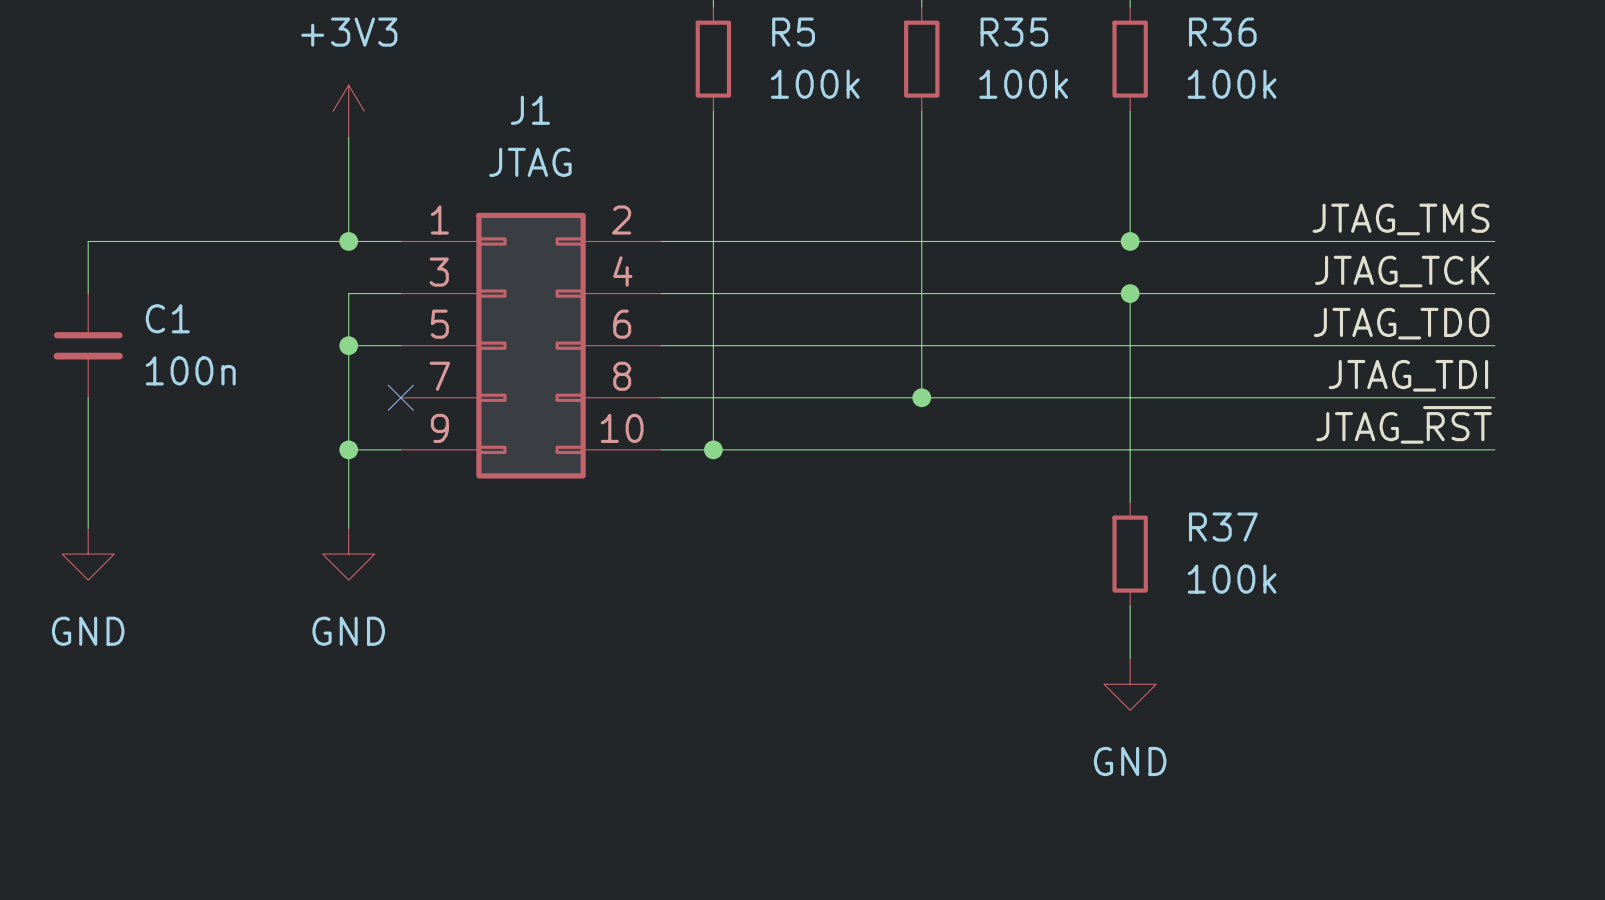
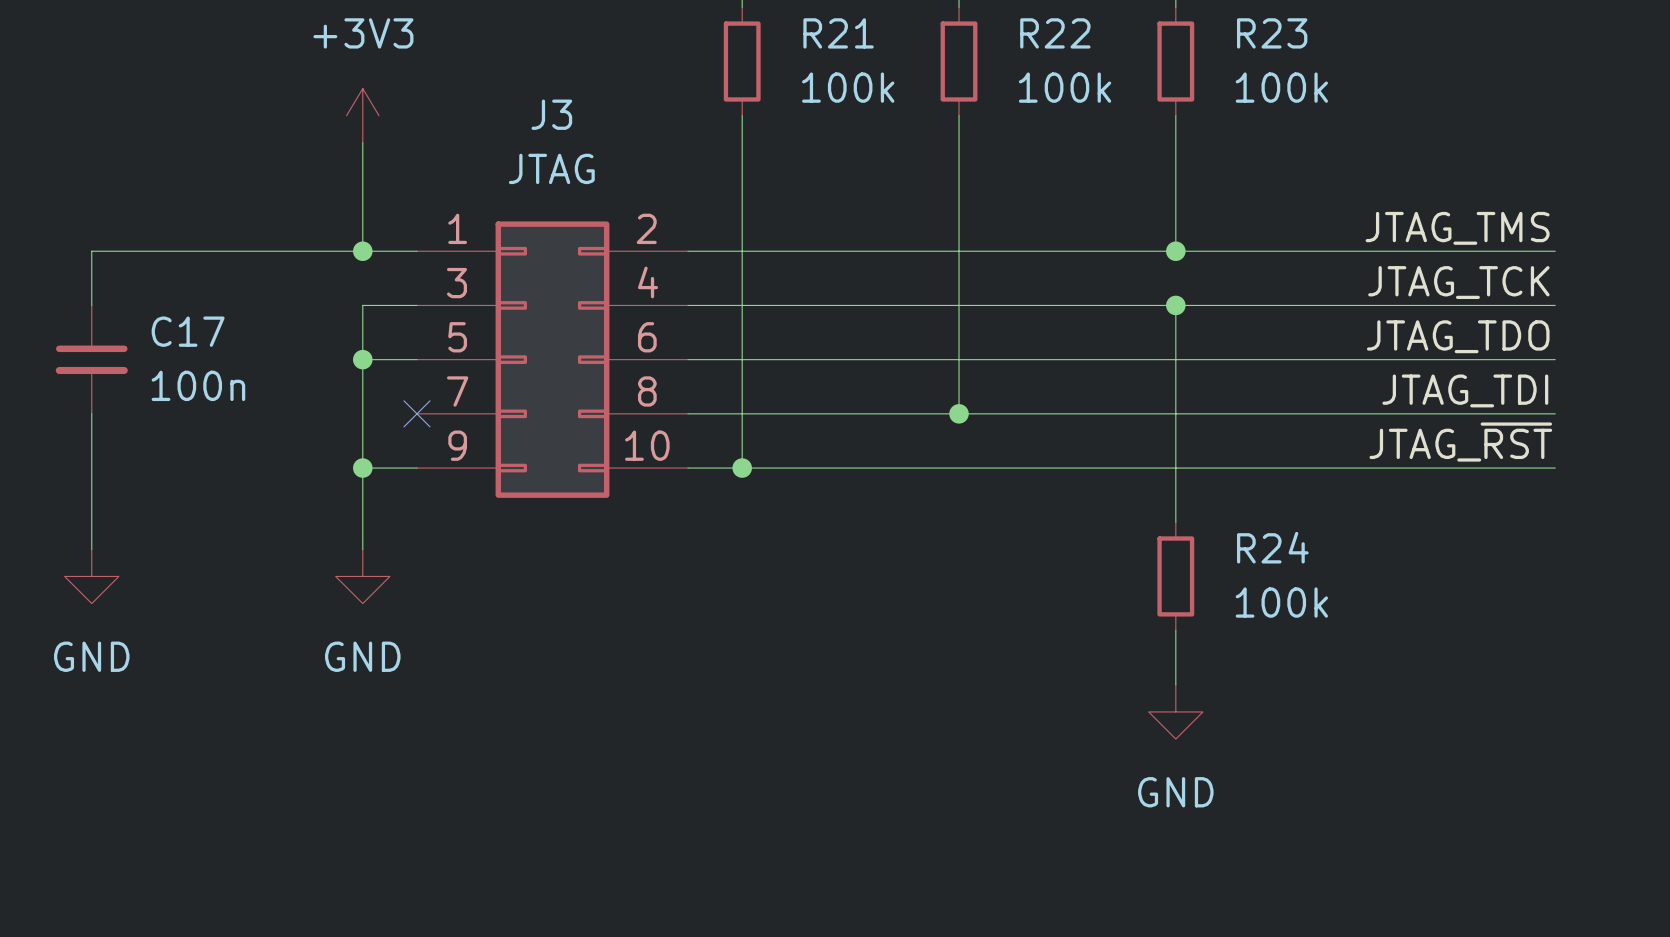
R5 name: R5 (793, 32) -> R21 (838, 33)
R35 name: R35 (1014, 32) -> R22 (1055, 33)
R36 name: R36 (1222, 32) -> R23 (1272, 33)
J1 name: J1 (530, 110) -> J3 (551, 114)
C1 name: C1 (167, 318) -> C17 (188, 331)
R37 name: R37 (1223, 527) -> R24 (1272, 547)

